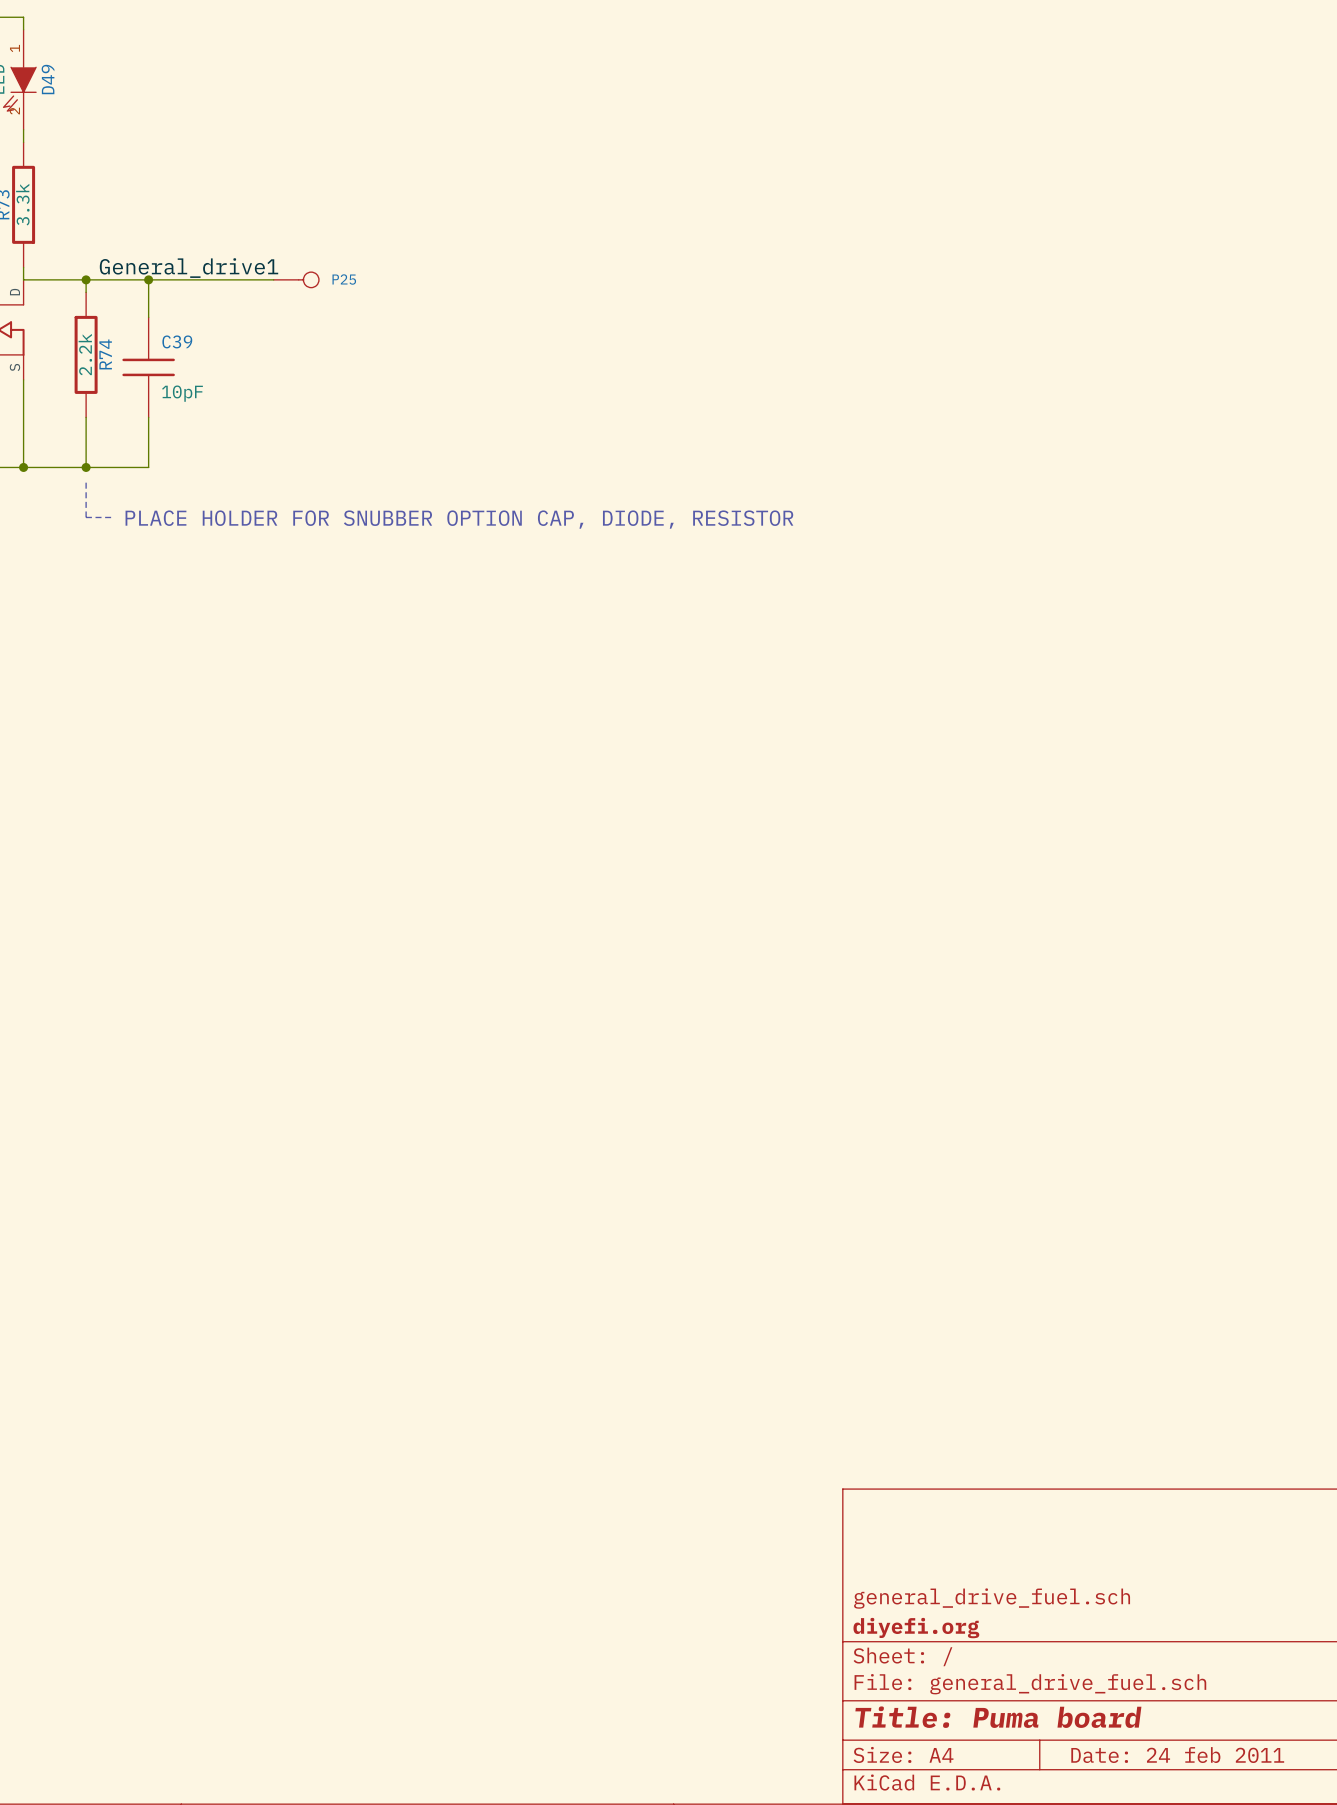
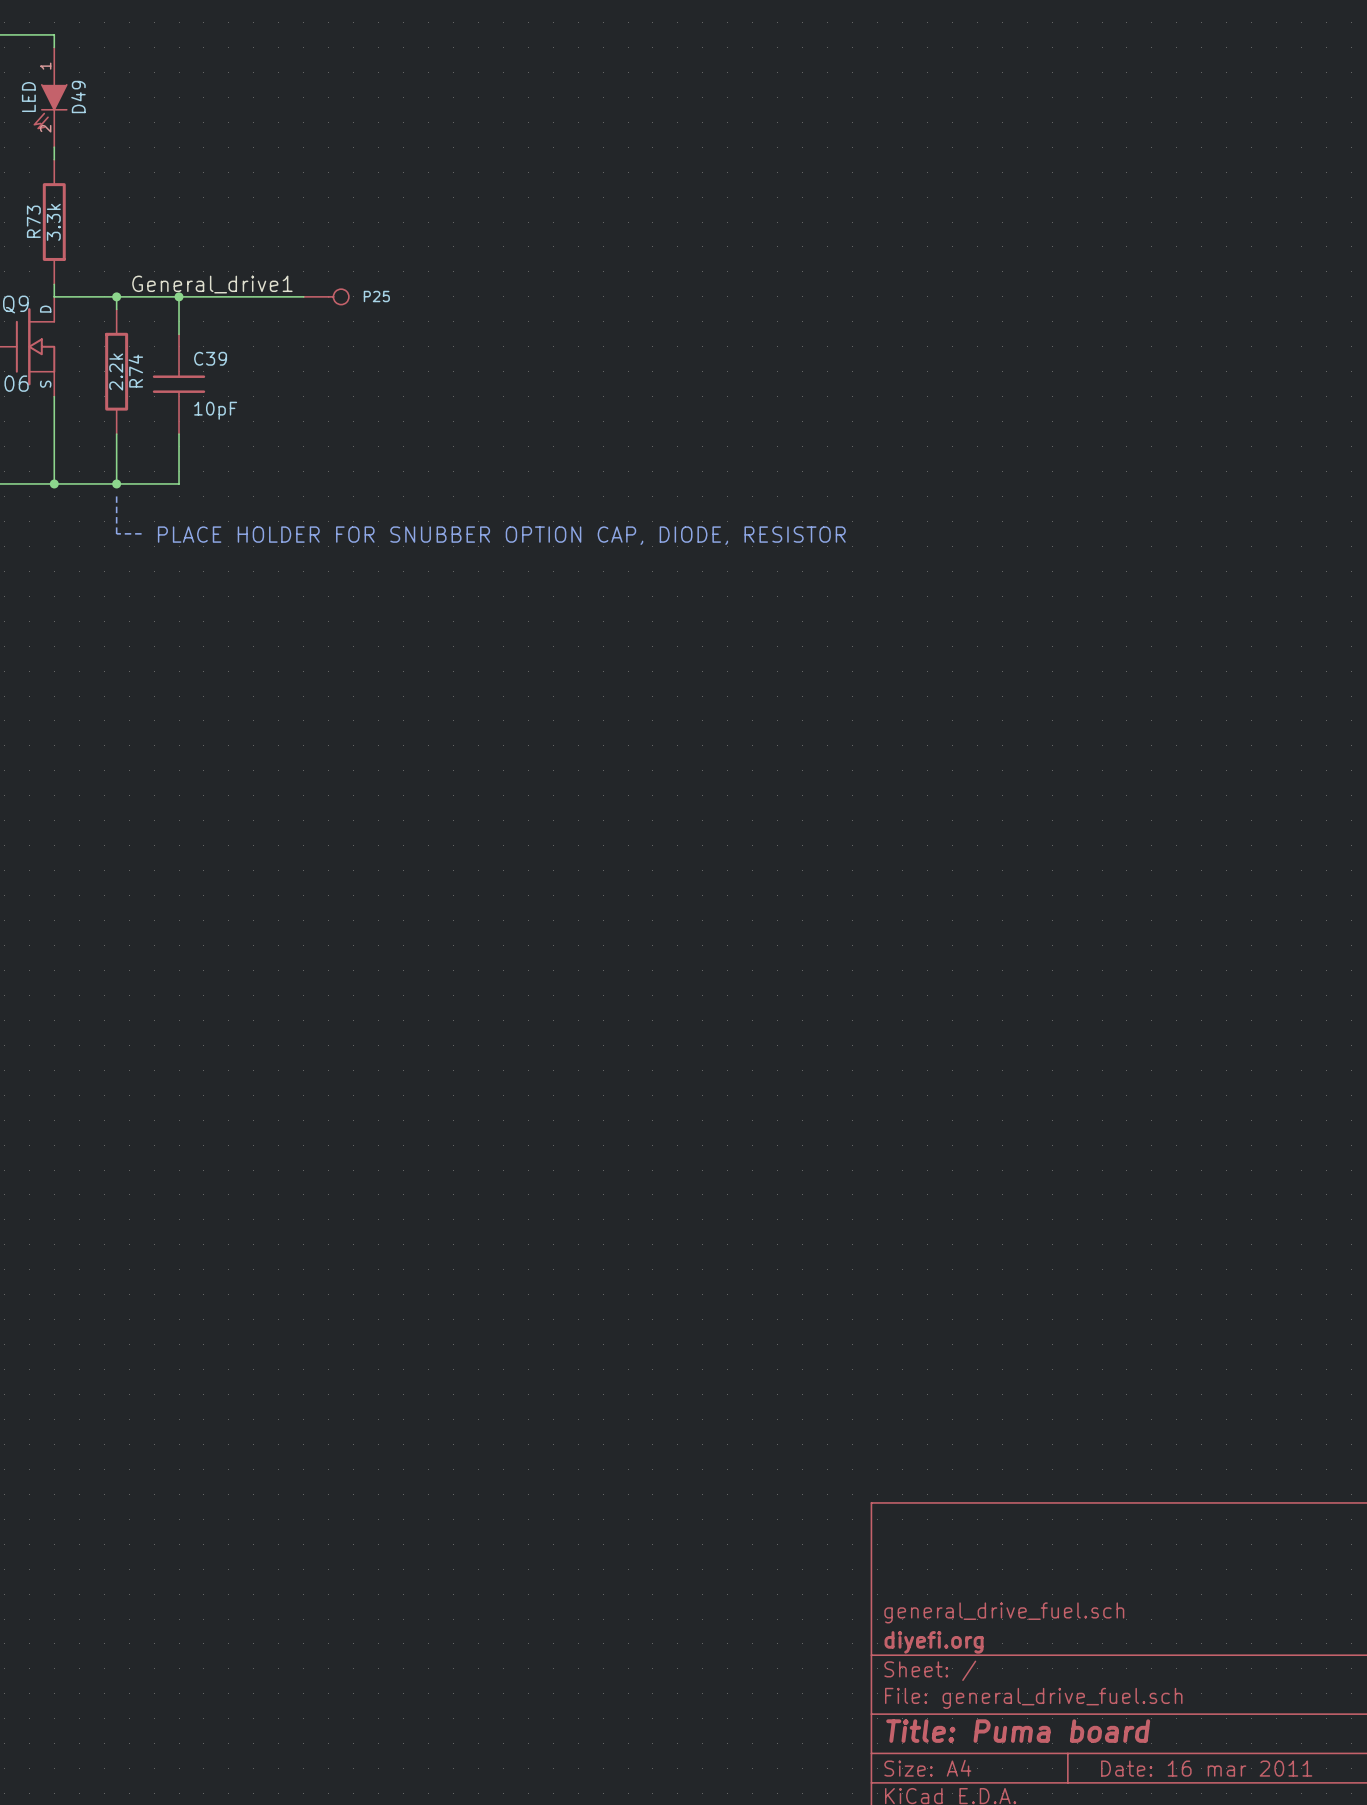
title block: Date: 24 feb 2011 (1177, 1755) -> Date: 16 mar 2011 (1206, 1768)

